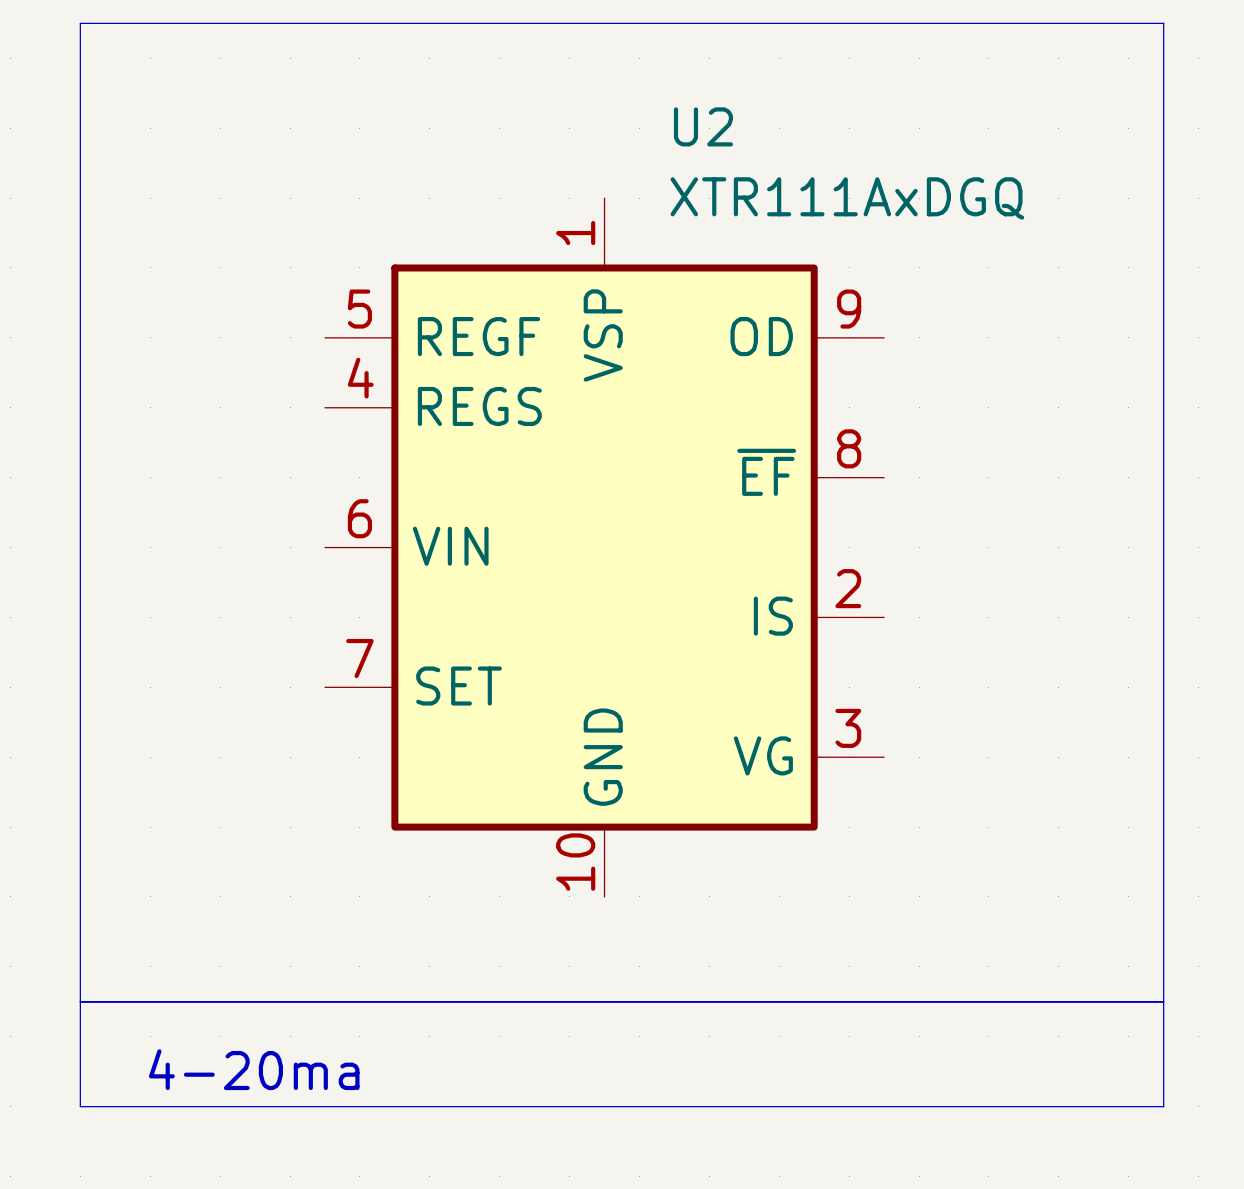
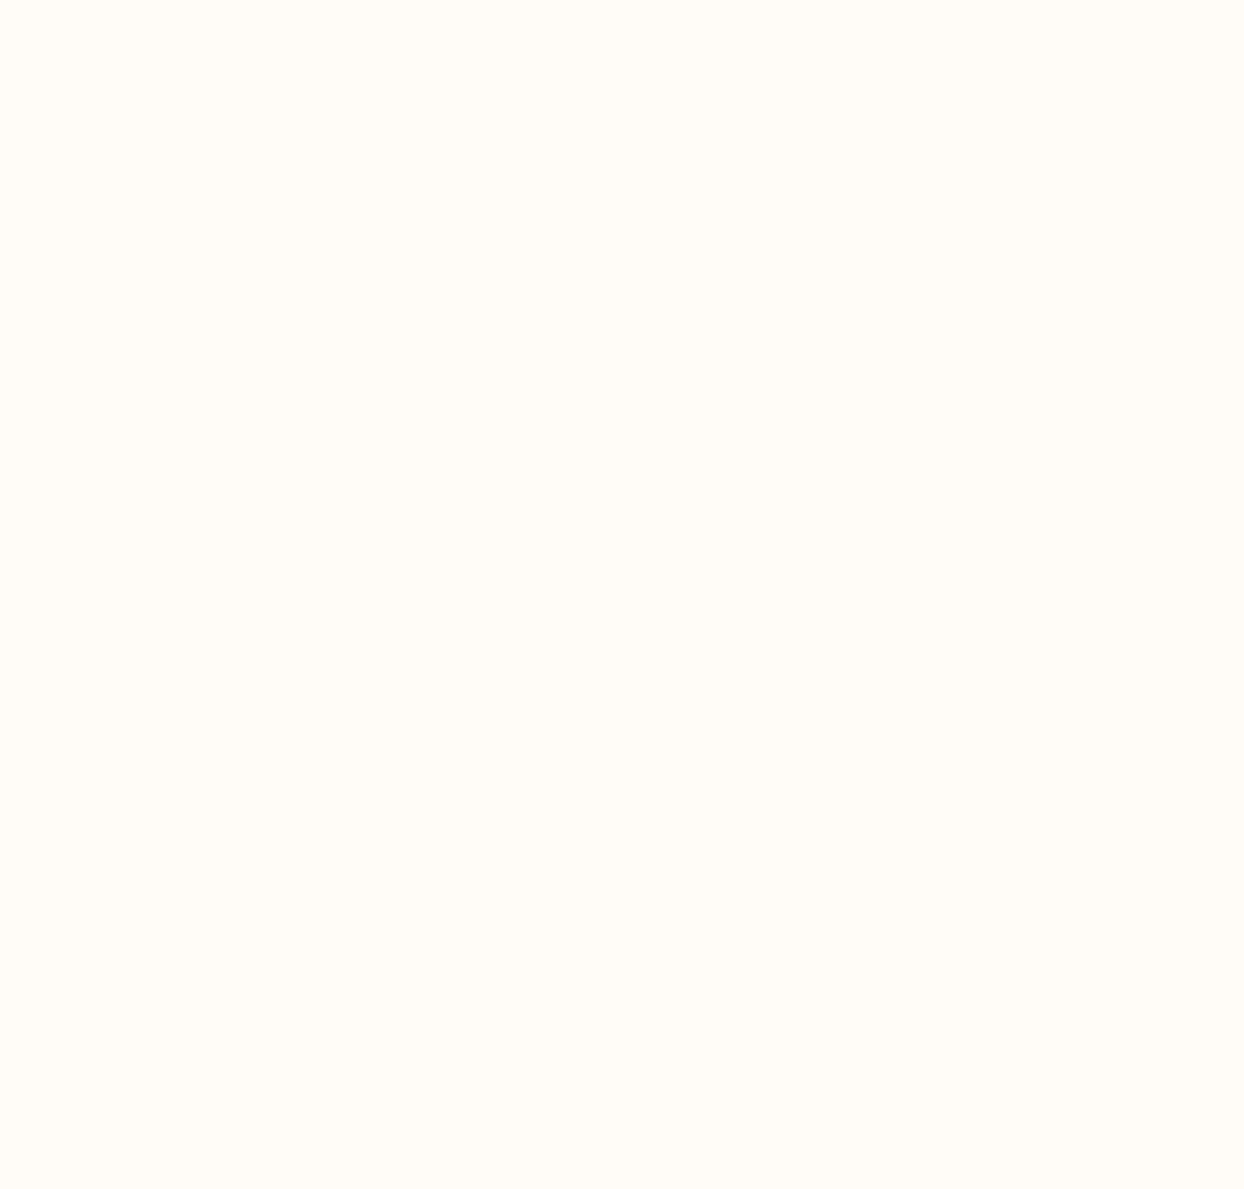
line: (80, 23) (1163, 23) (1163, 1106) (80, 1106) (80, 23) -> none
U2: XTR111AxDGQ (604, 547) -> none
line: (80, 1001) (1163, 1001) -> none
text: 4-20ma (254, 1069) -> none

